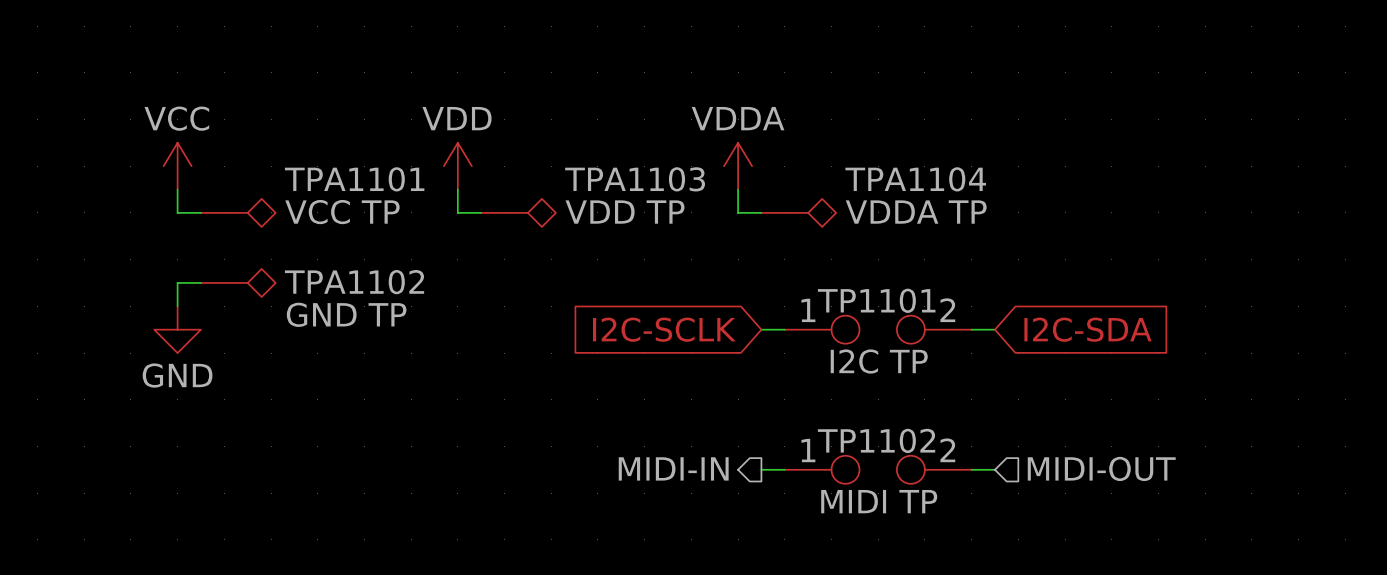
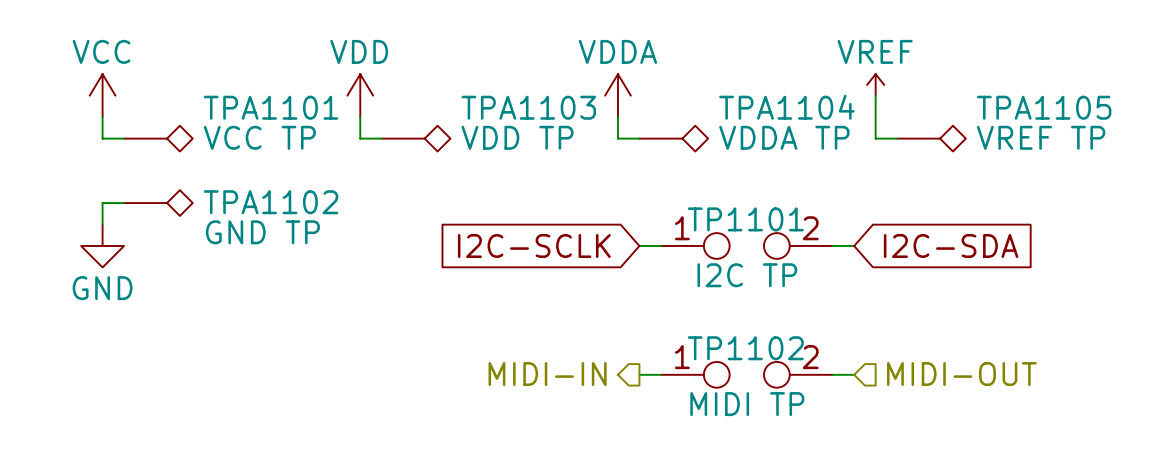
power symbol: none -> VREF (875, 84)
wire: none -> (875, 95) (875, 138) (897, 138)
TPA1105: none -> VREF TP (931, 138)

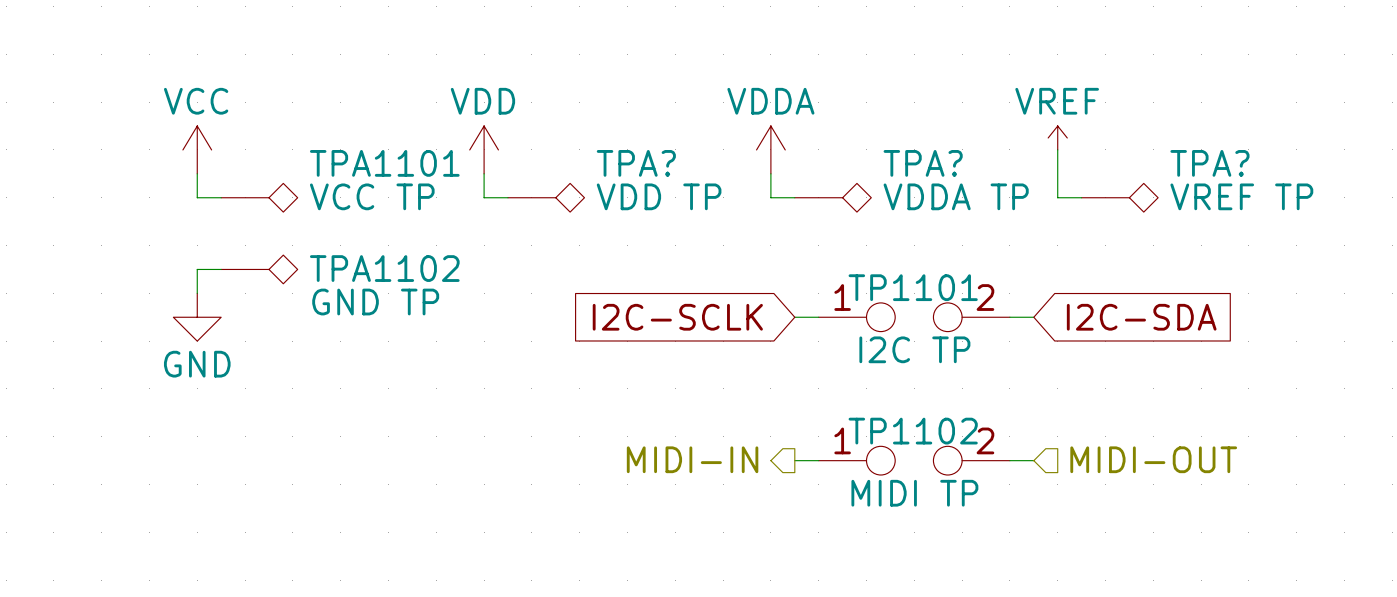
TPA1103 name: TPA1103 (528, 107) -> TPA? (636, 163)
TPA1104 name: TPA1104 (786, 107) -> TPA? (923, 163)
TPA1105 name: TPA1105 (1044, 107) -> TPA? (1209, 163)

